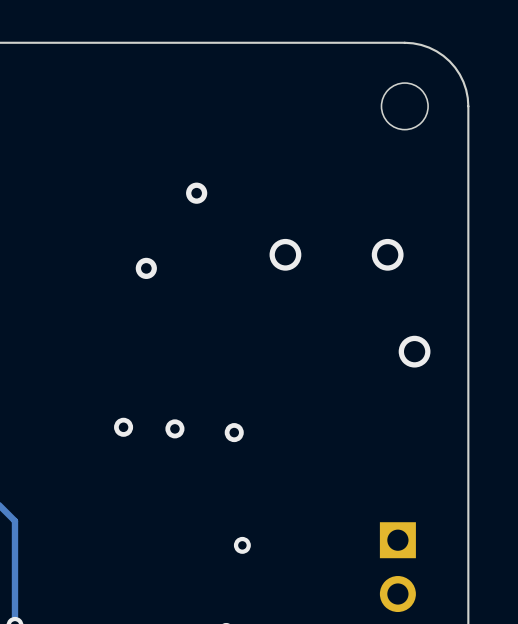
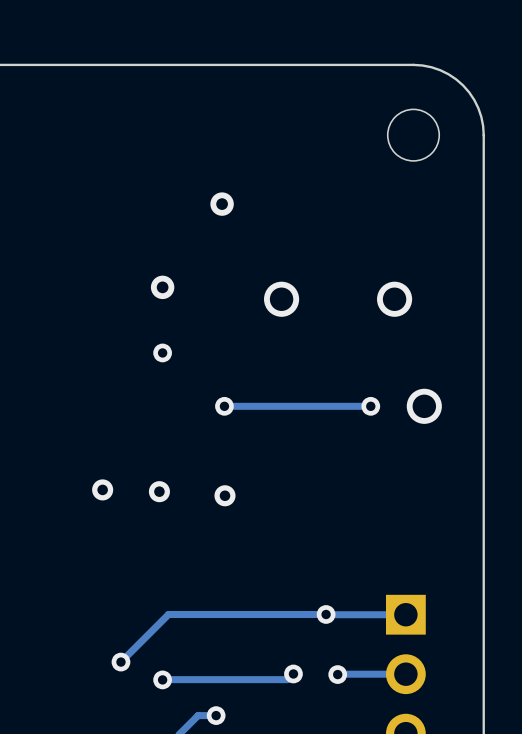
via: none -> (222, 204)
via: (196, 193) -> none
via: none -> (162, 287)
via: (146, 268) -> none
via: none -> (162, 352)
via: none -> (224, 406)
track: none -> (370, 406) (224, 406)
via: none -> (370, 406)
track: none -> (326, 614) (168, 614) (120, 662)
via: none -> (326, 614)
track: none -> (405, 614) (326, 614)
via: (242, 545) -> none
via: none -> (120, 662)
track: none -> (293, 673) (287, 679) (162, 679)
via: none -> (293, 673)
via: none -> (337, 674)
track: none -> (405, 674) (337, 674)
via: none -> (162, 679)

